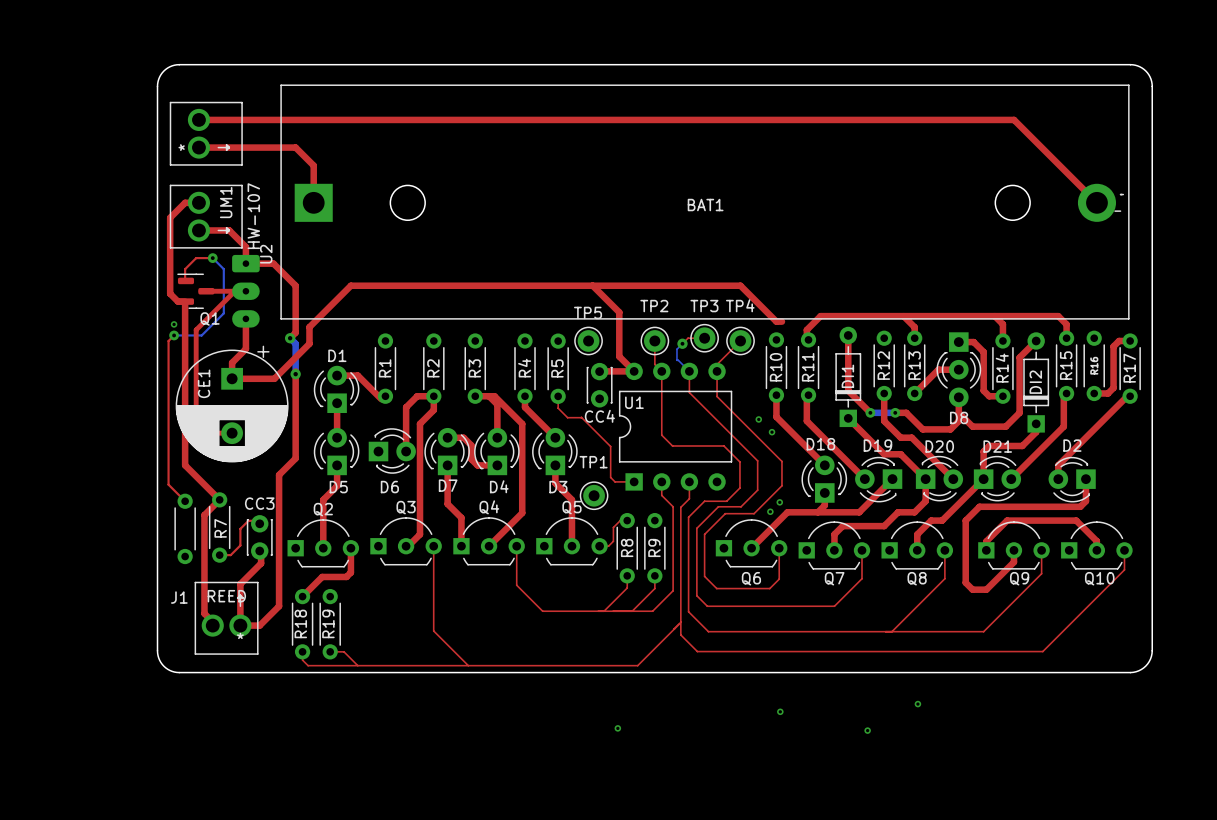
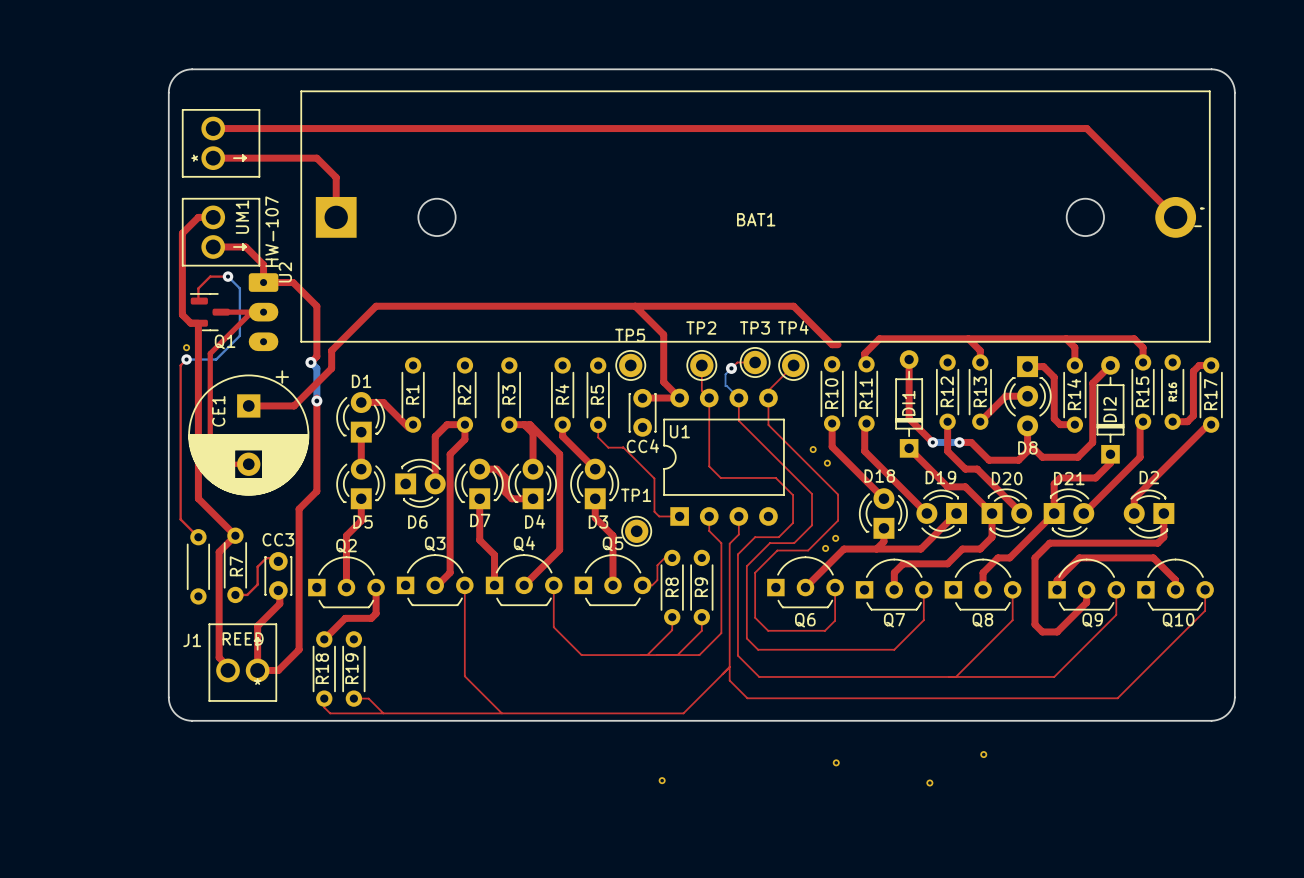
top track: (245, 318) (245, 349) (232, 362) (232, 378) -> none

